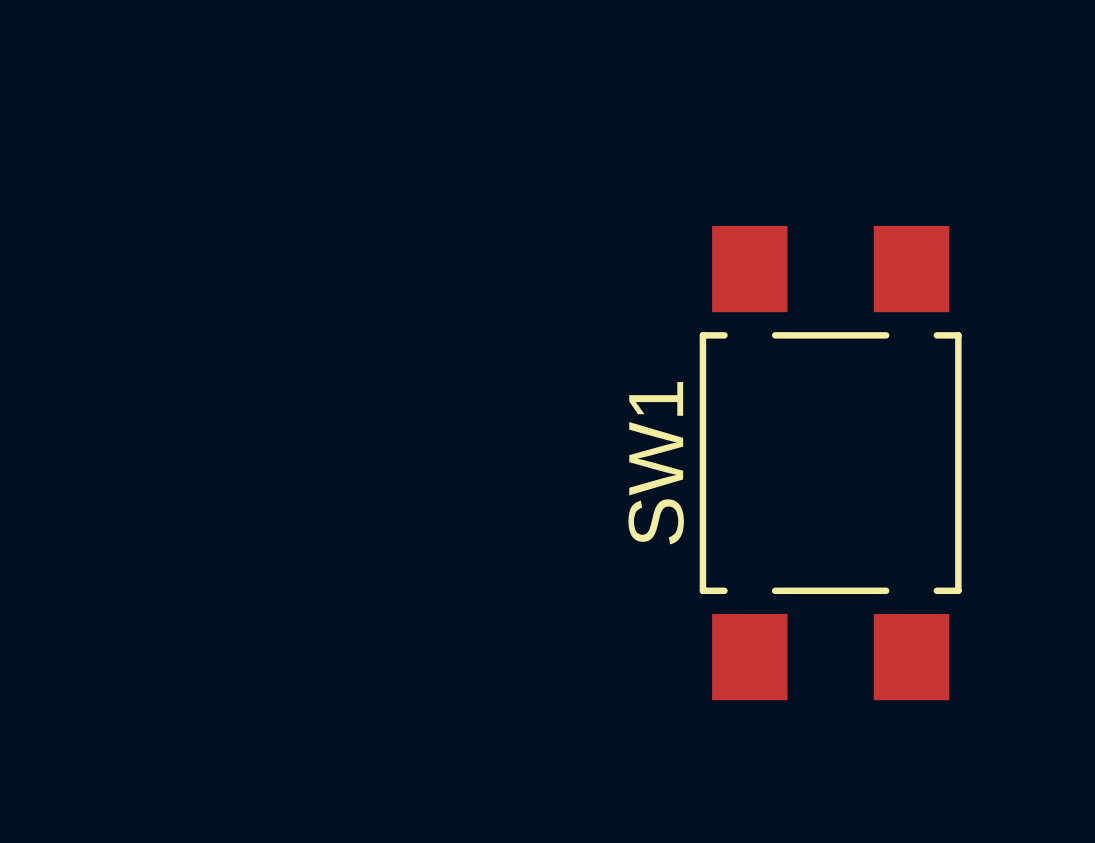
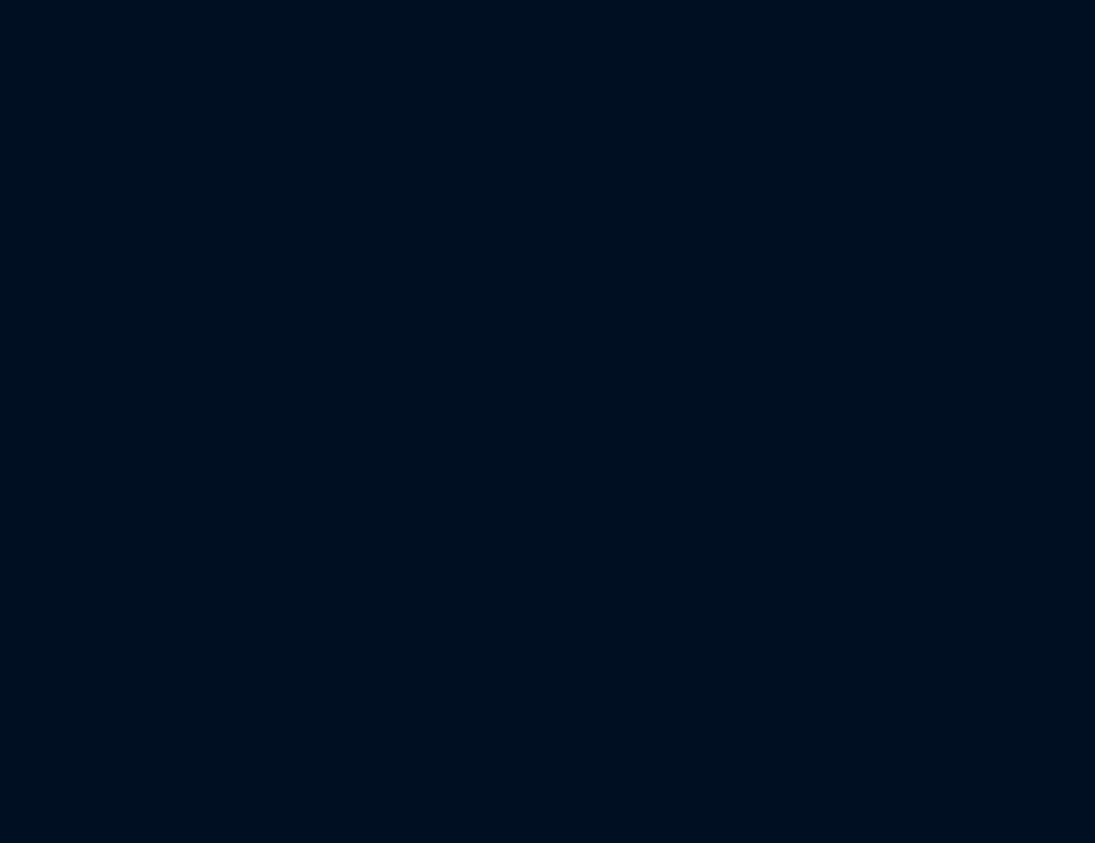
SW1: (830, 463) -> none

